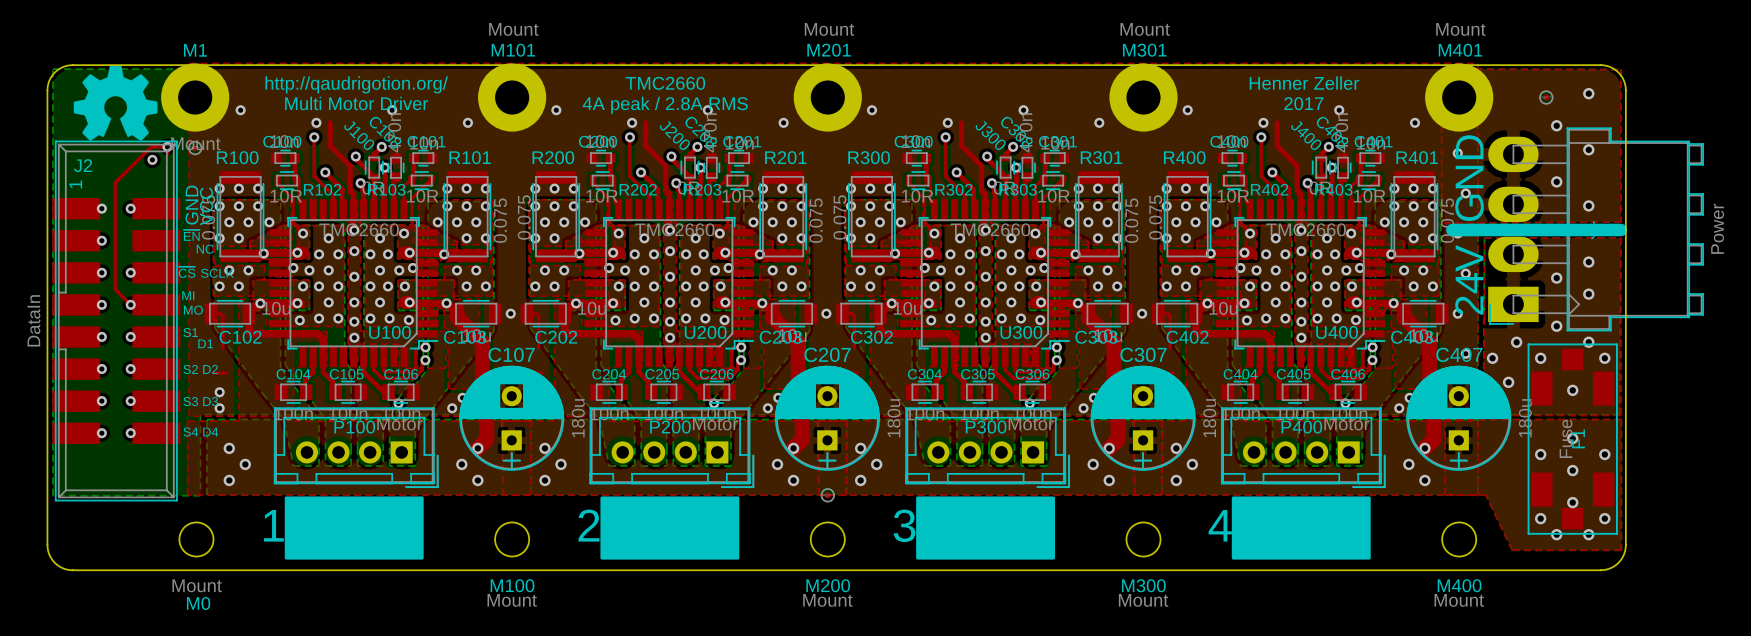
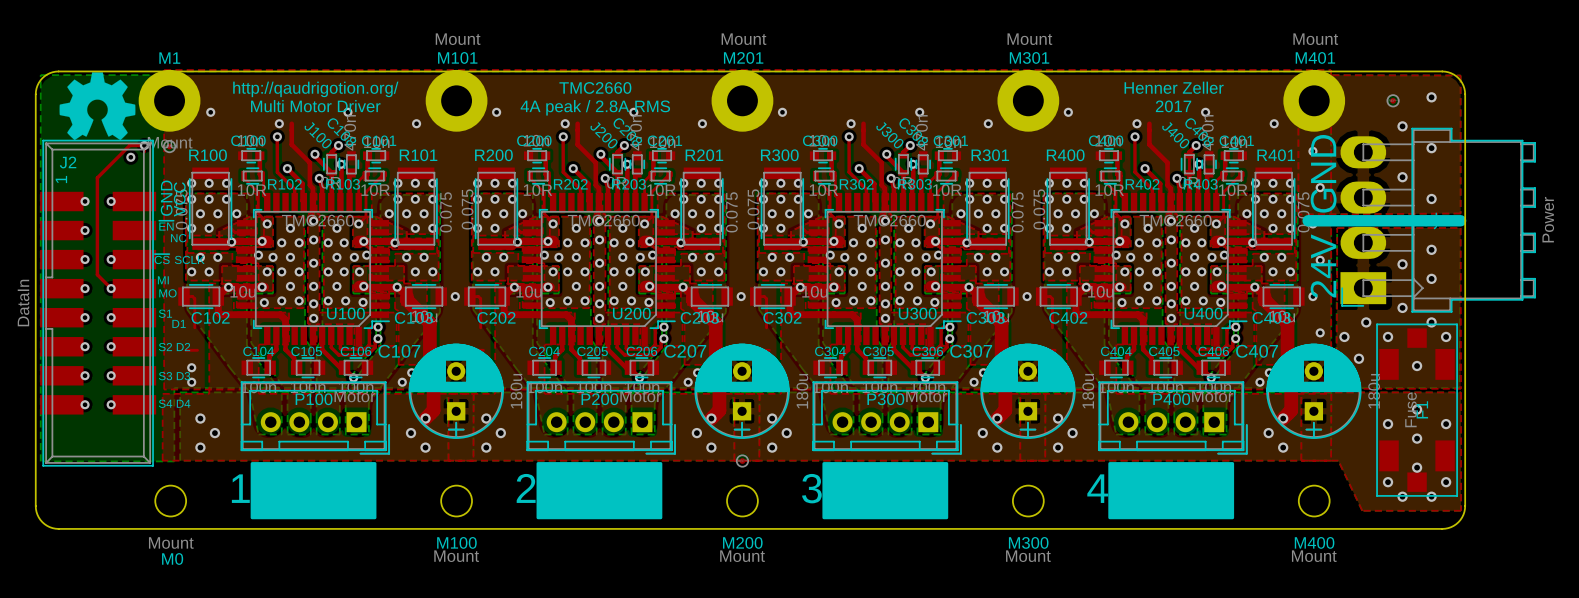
C107 name position: C107 (511, 354) -> C107 (399, 351)
C207 name position: C207 (827, 354) -> C207 (685, 351)
C307 name position: C307 (1143, 354) -> C307 (971, 351)
C407 name position: C407 (1459, 354) -> C407 (1257, 351)

